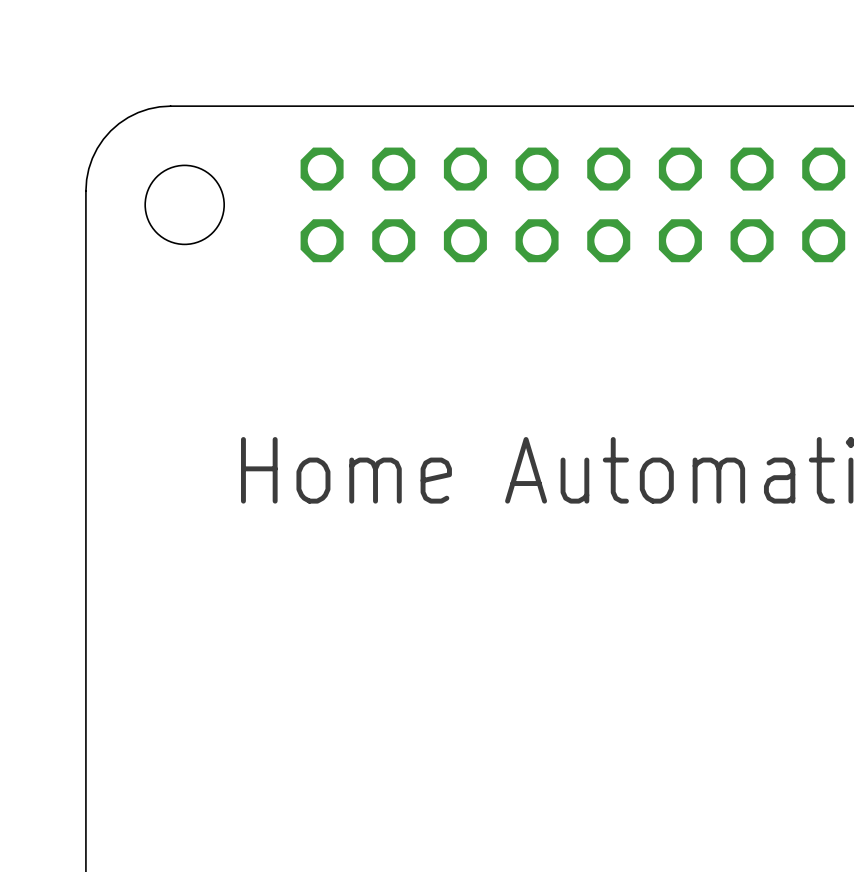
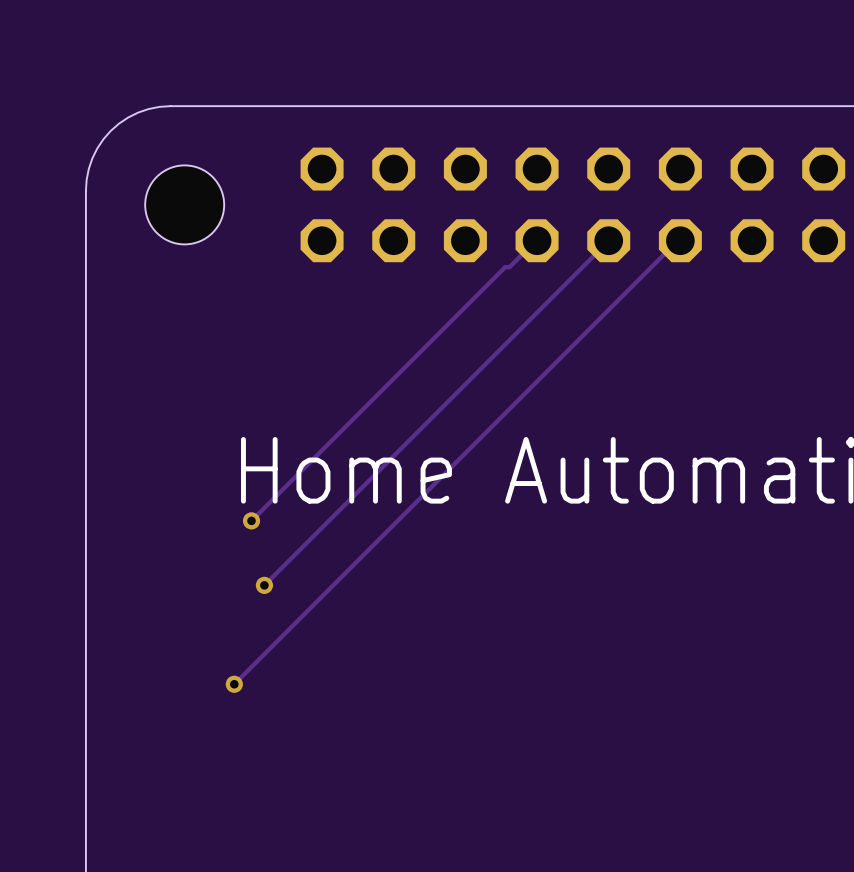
track: none -> (537, 240) (509, 267) (505, 267) (251, 520)
track: none -> (608, 240) (264, 585)
track: none -> (680, 240) (677, 241) (234, 684)
via: none -> (251, 520)
via: none -> (264, 585)
via: none -> (234, 684)

